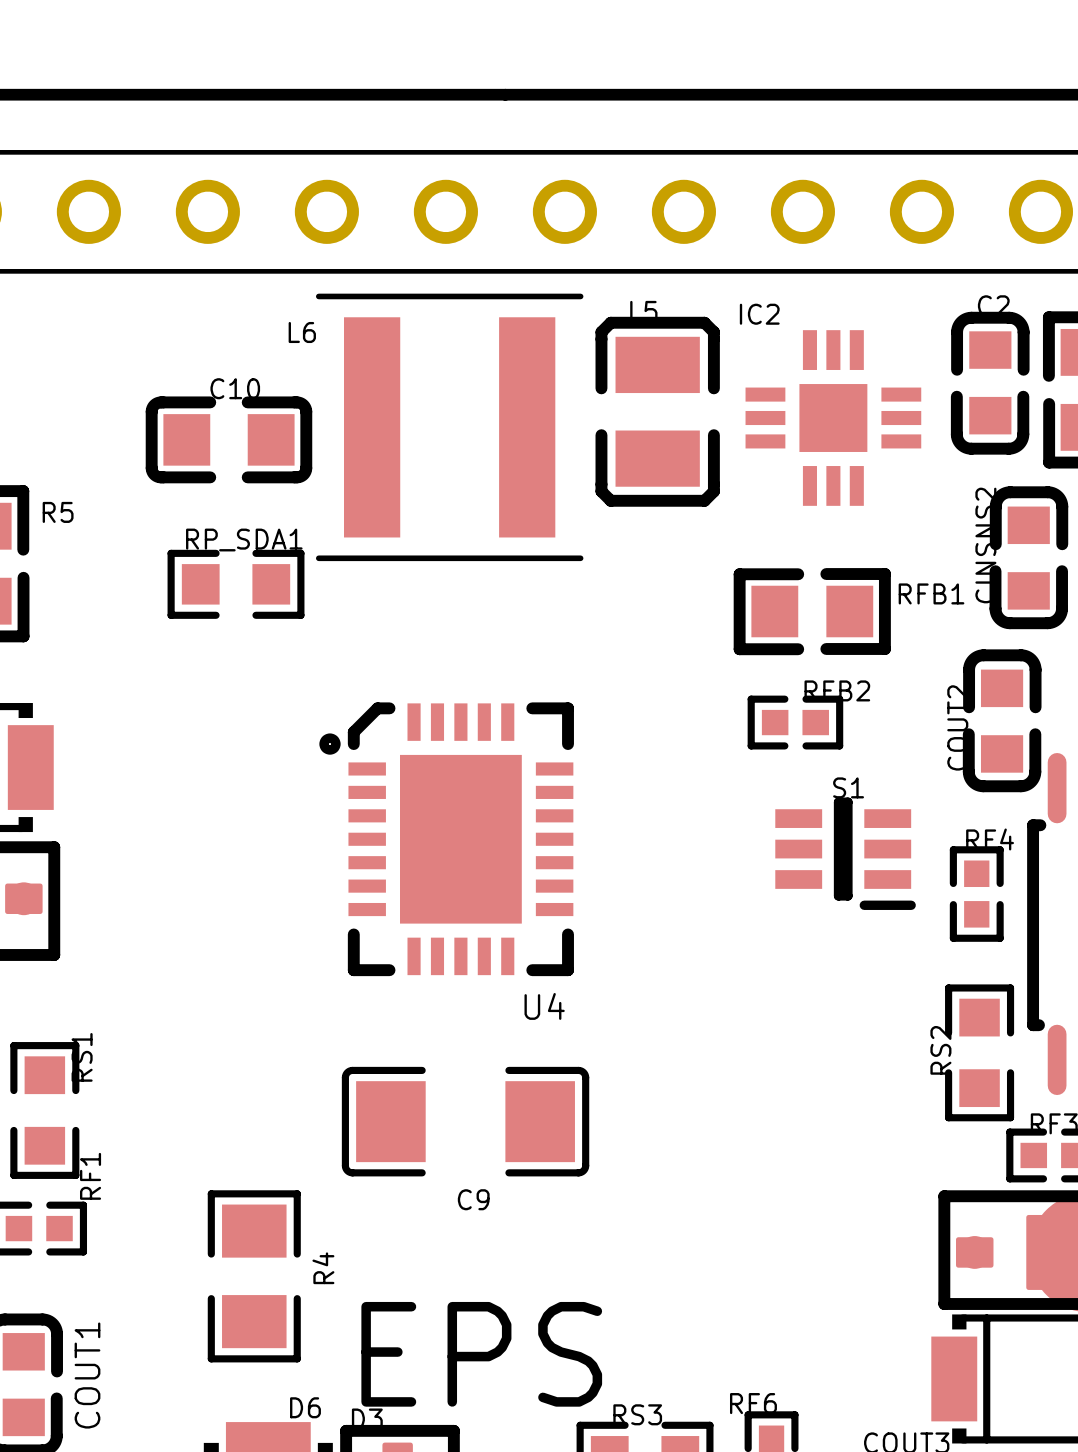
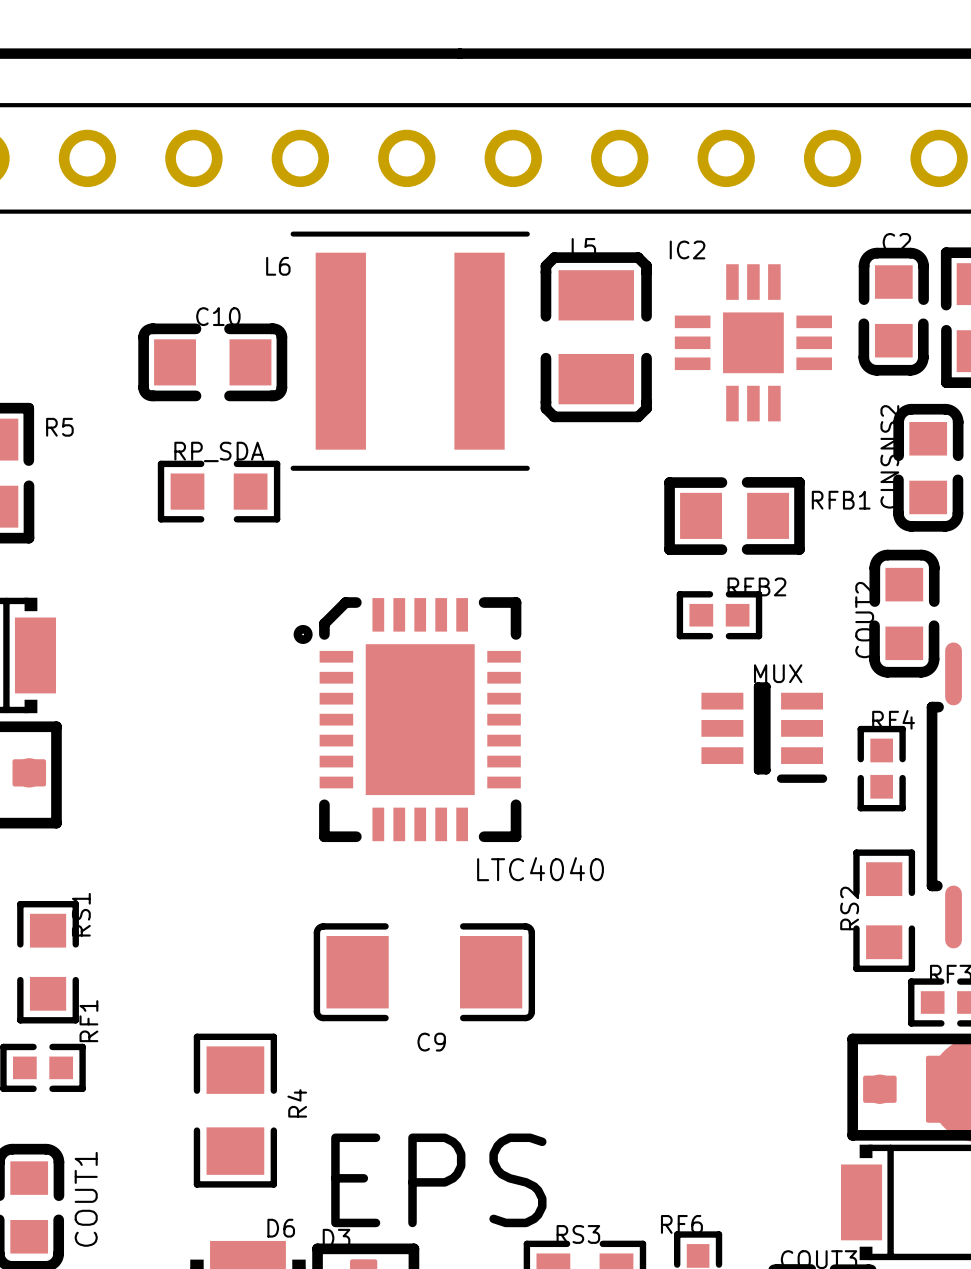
RP_SDA1 name: RP_SDA1 (244, 540) -> RP_SDA (219, 451)
S1 name: S1 (848, 787) -> MUX (778, 673)
U4 name: U4 (544, 1006) -> LTC4040 (540, 869)

